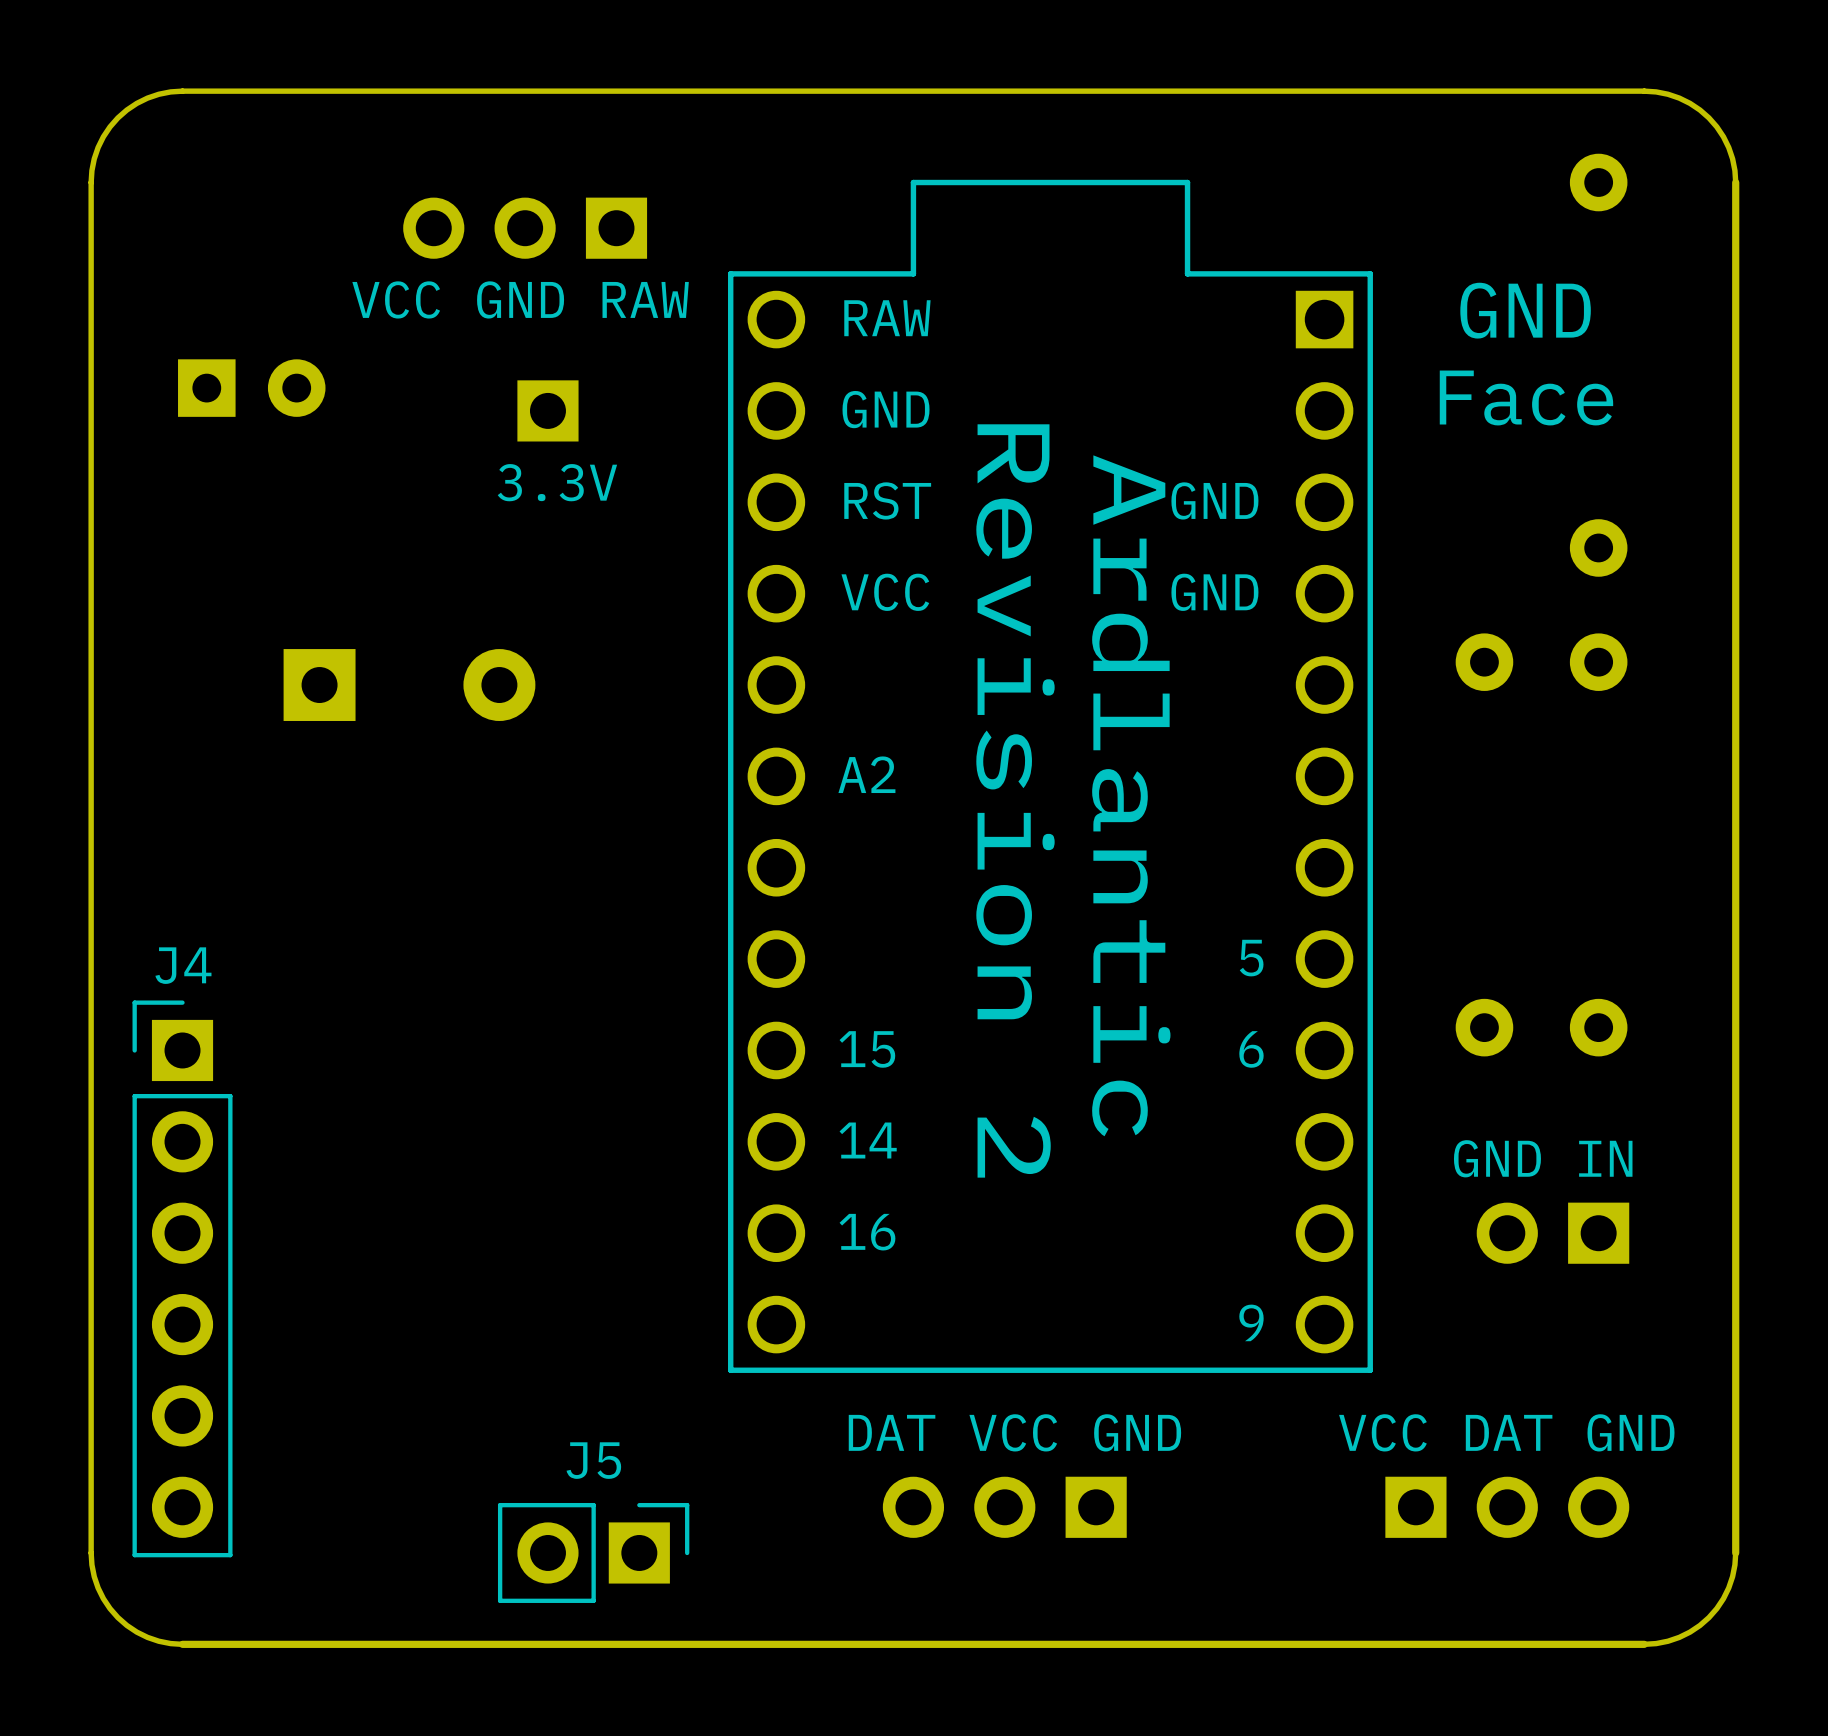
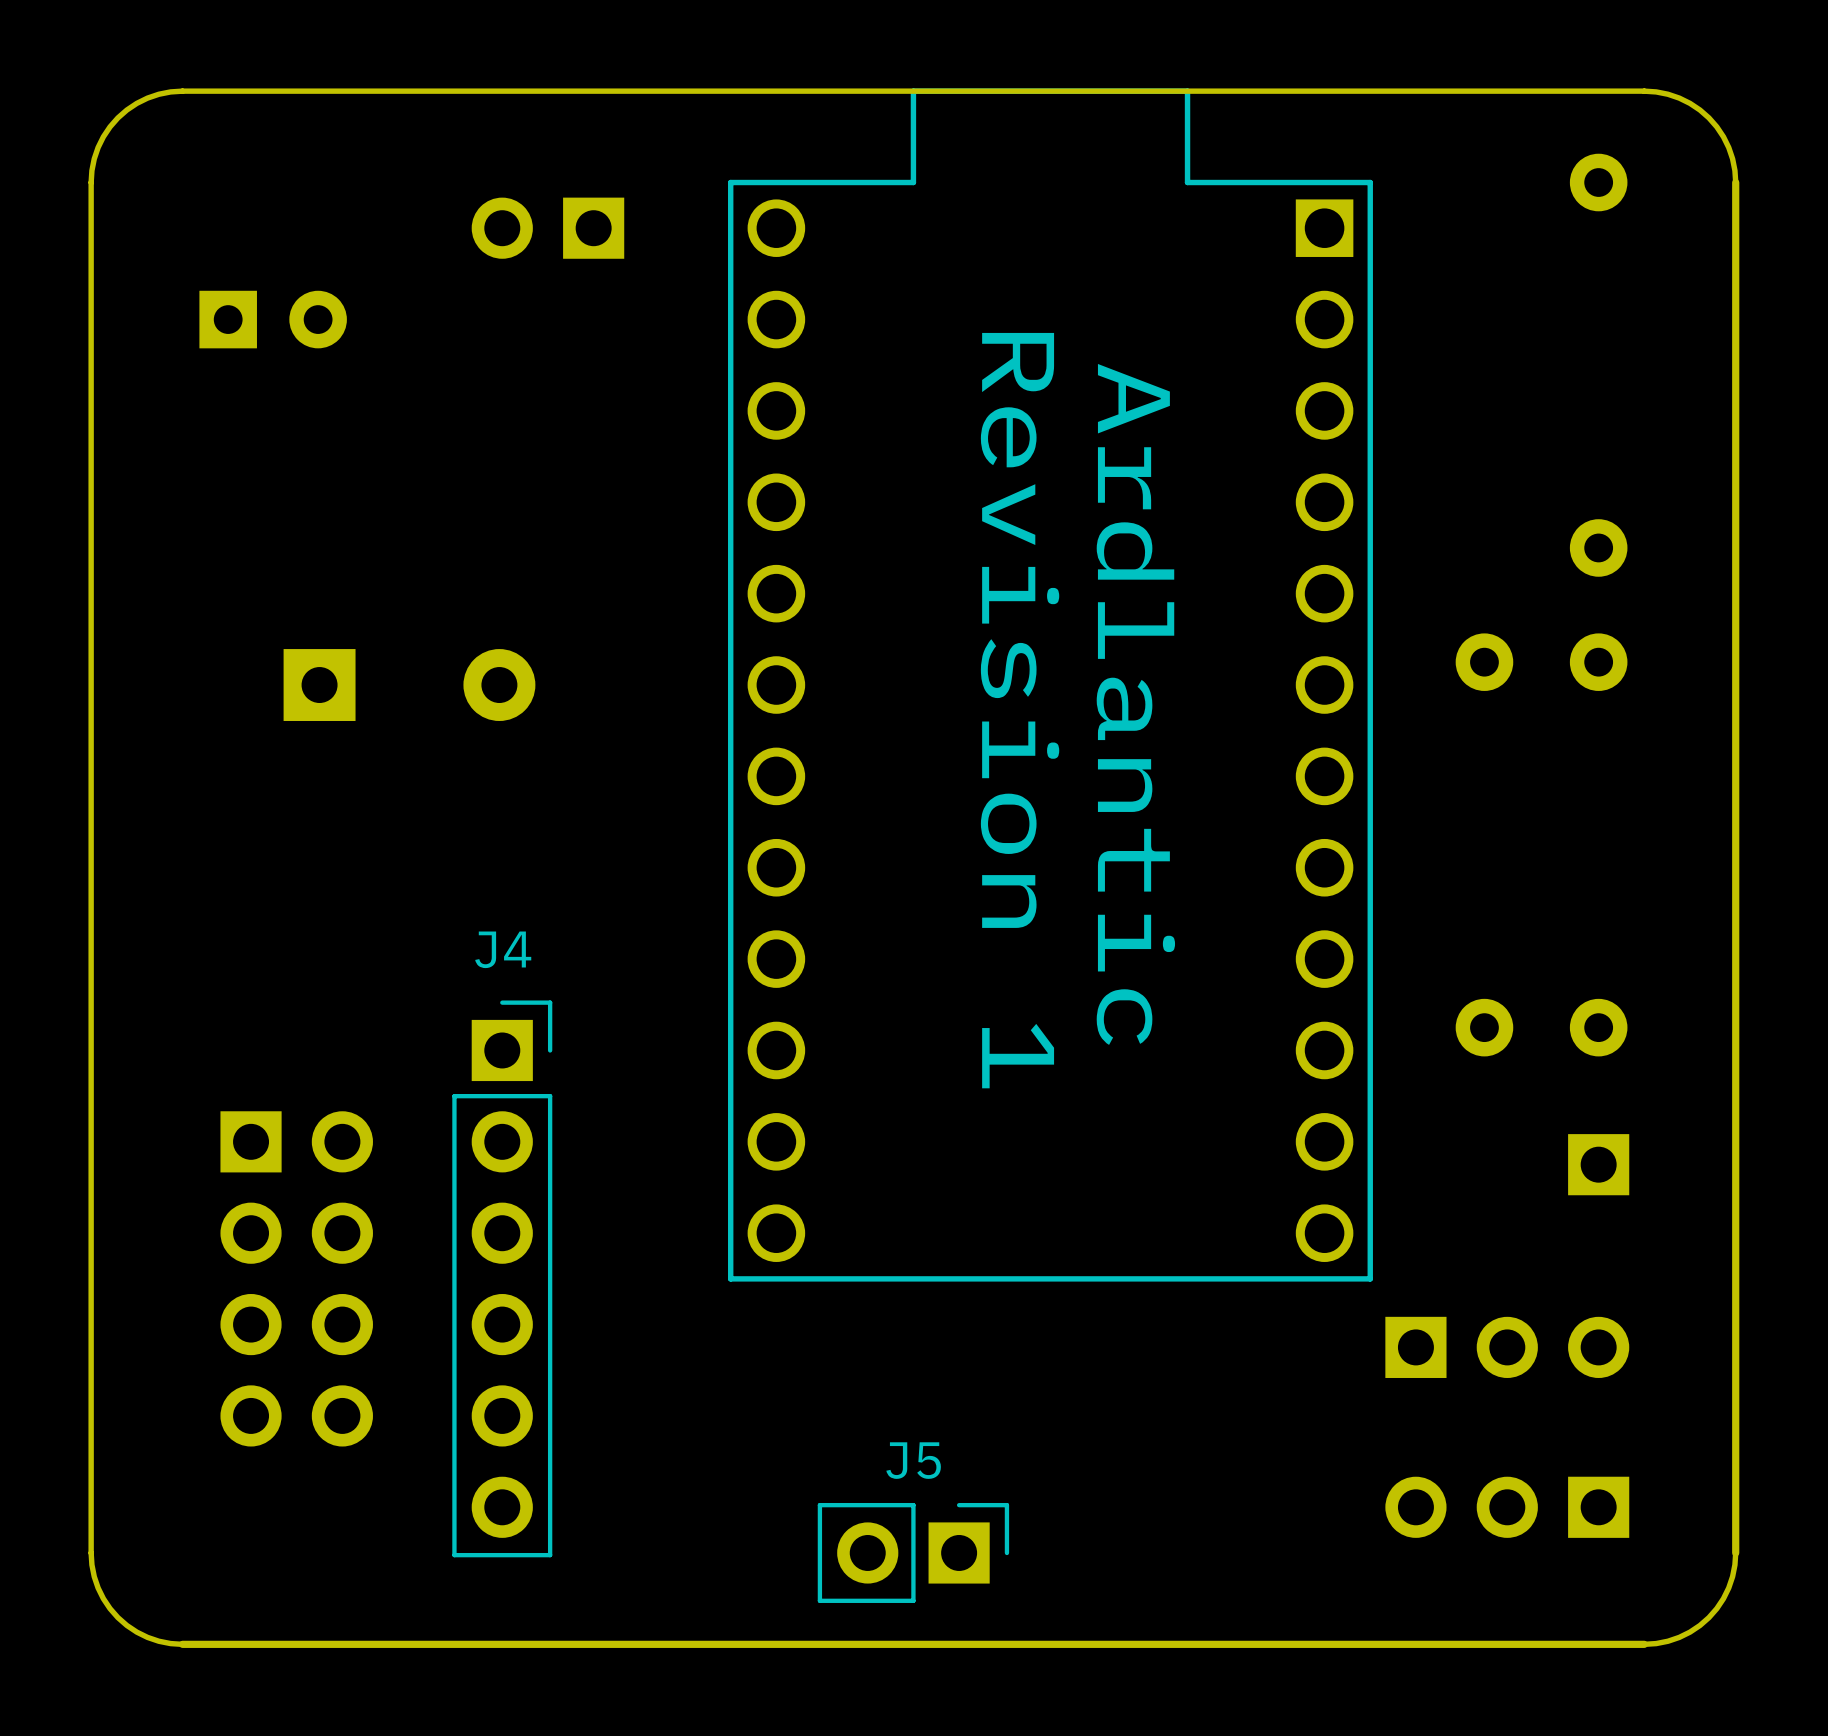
part footprint: [403, 197, 648, 259] -> [471, 197, 625, 259]
text: VCC GND RAW (520, 299) -> none
text: GND (1525, 310) -> none
text: RAW (887, 318) -> none
part position: (251, 388) -> (273, 319)
text: Face (1526, 397) -> none
text: GND (886, 409) -> none
part: (547, 410) -> none
text: 3.3V (557, 482) -> none
text: RST (887, 500) -> none
text: GND (1214, 500) -> none
text: VCC (885, 592) -> none
text: GND (1214, 592) -> none
text: A2 (866, 774) -> none
part position: (1050, 776) -> (1050, 685)
text position: Ardlantic (1131, 795) -> Ardlantic (1135, 704)
text: Revision 2 (1015, 800) -> Revision 1 (1020, 710)
text: 5 (1251, 958) -> none
J4 footprint: [132, 1000, 233, 1558] -> [452, 1000, 553, 1558]
text: 15 (867, 1049) -> none
text: 6 (1251, 1049) -> none
text: 14 (868, 1140) -> none
text: GND IN (1543, 1158) -> none
part: none -> (1598, 1164)
text: 16 (867, 1232) -> none
part: (1552, 1233) -> none
part: none -> (296, 1278)
text: 9 (1251, 1322) -> none
text: DAT VCC GND (1014, 1432) -> none
text: VCC DAT GND (1506, 1432) -> none
part rotation: 0° (1004, 1507) -> 180° (1507, 1347)
part position: (1004, 1507) -> (1507, 1347)
part rotation: 0° (1507, 1507) -> 180° (1507, 1507)
J5 position: (593, 1552) -> (913, 1552)

